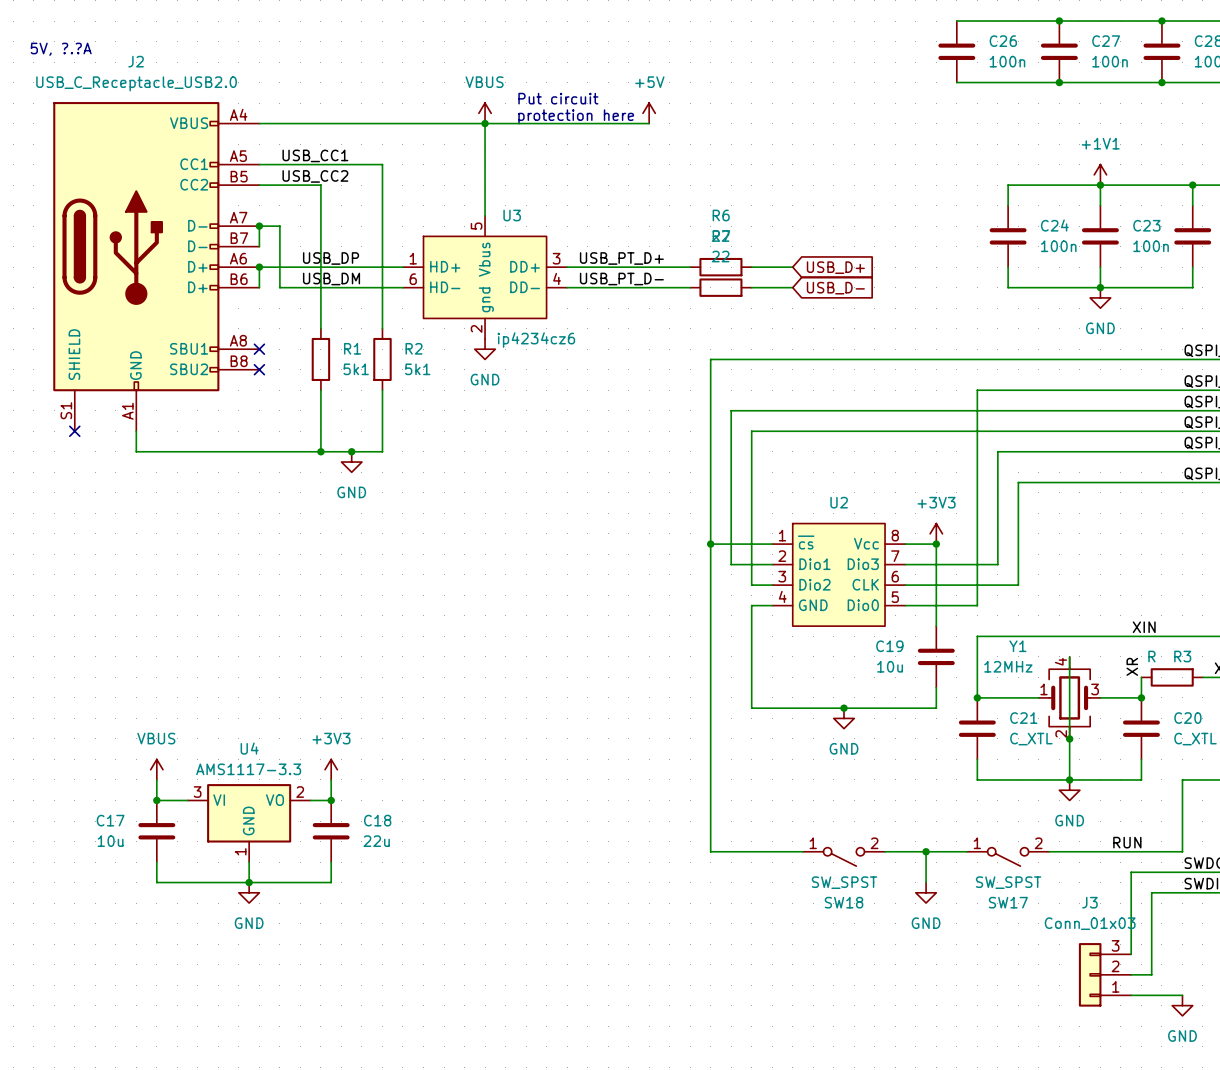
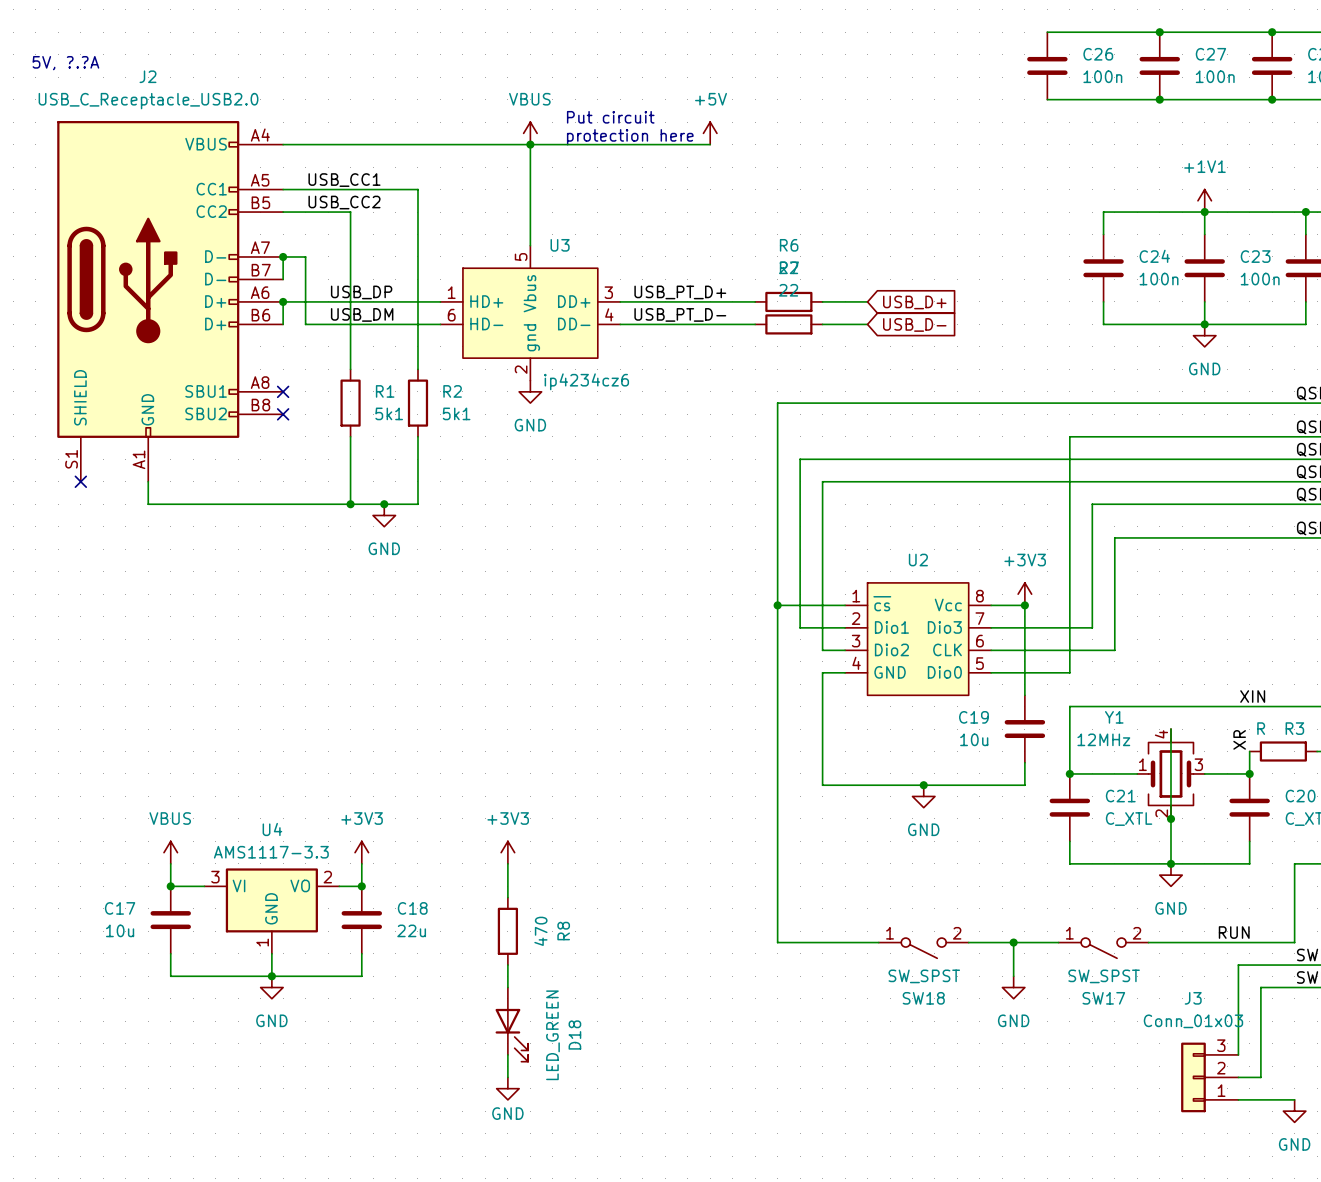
power symbol: none -> +3V3 (507, 852)
wire: none -> (507, 863) (507, 897)
R8: none -> 470 (507, 931)
wire: none -> (507, 965) (507, 987)
D18: none -> LED_GREEN (511, 1024)
wire: none -> (507, 1054) (507, 1077)
power symbol: none -> GND (507, 1088)

